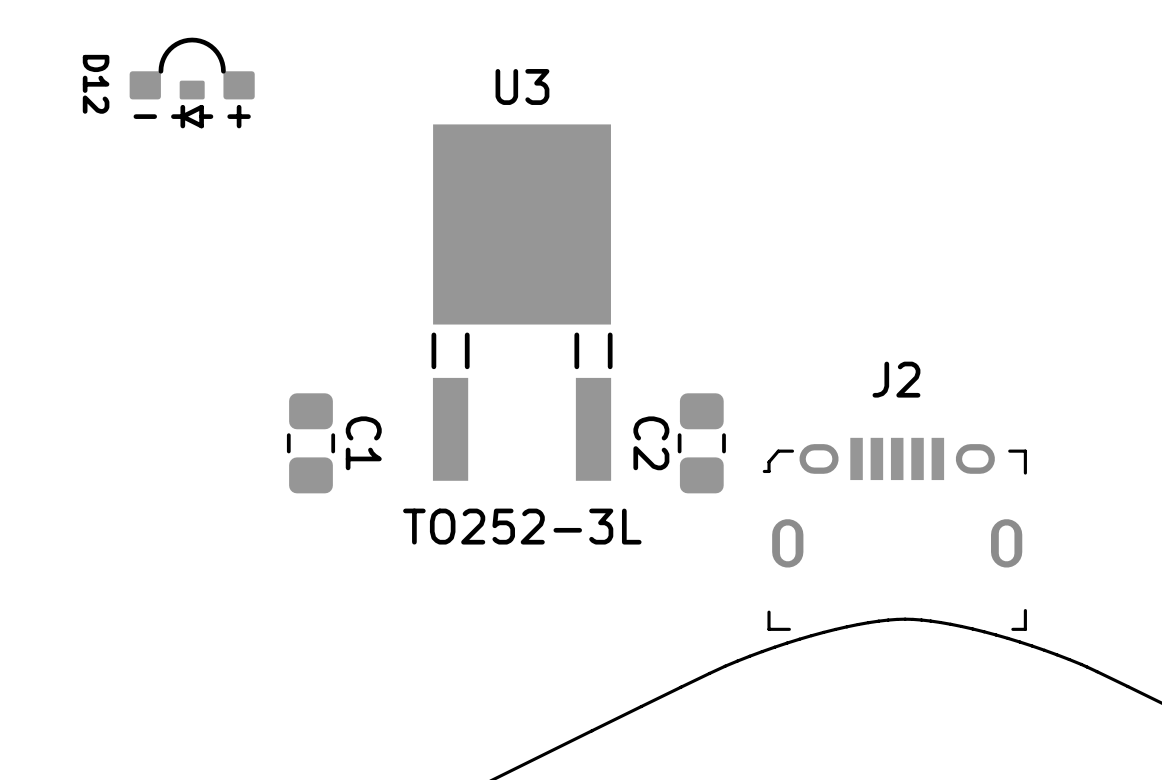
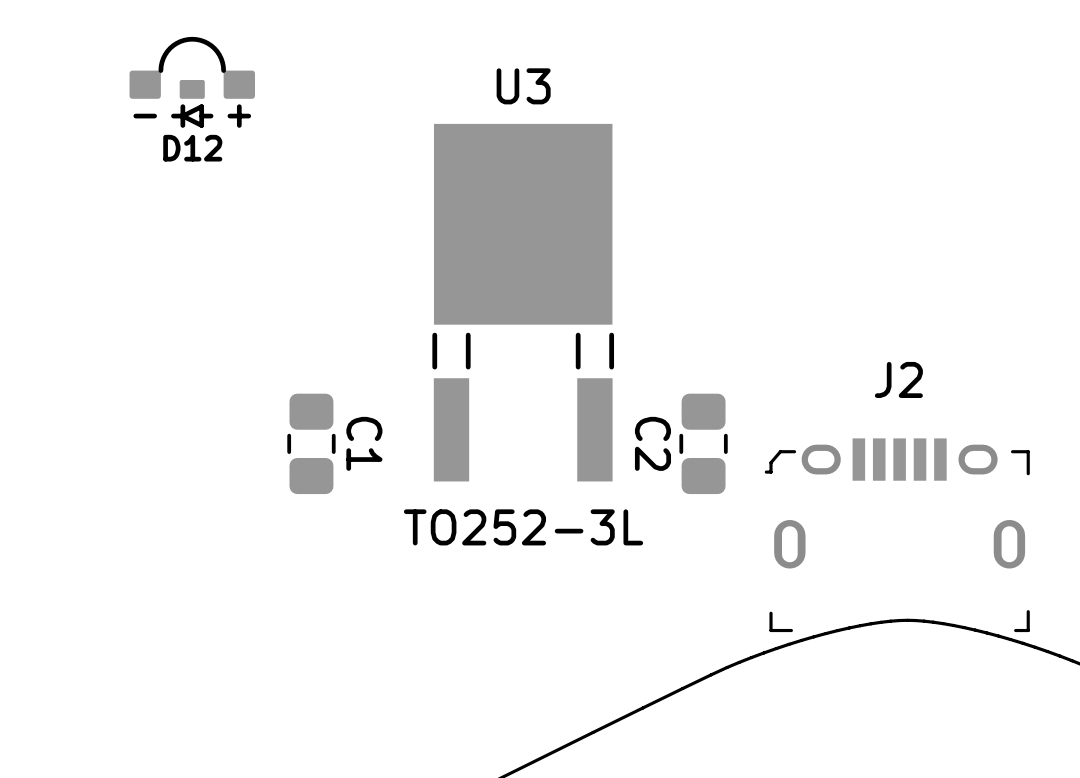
D12 name rotation: 0° (96, 84) -> 90° counterclockwise (192, 148)
D12 name position: D12 (96, 84) -> D12 (192, 148)

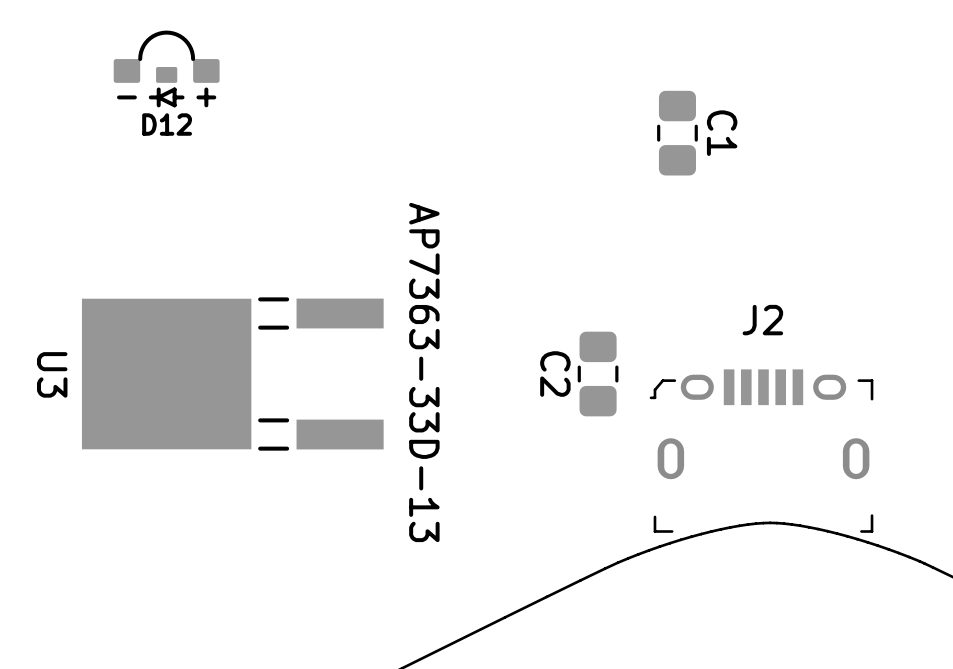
U3 rotation: 0° (523, 302) -> 90° counterclockwise (232, 374)
U3 position: (523, 302) -> (232, 374)
C1 position: (311, 443) -> (677, 133)
U3 value: TO252-3L (523, 527) -> AP7363-33D-13 (424, 372)

